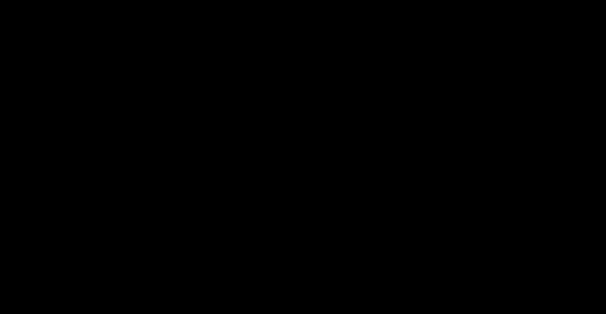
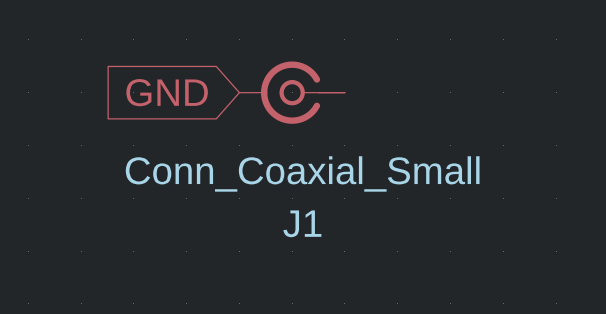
global label: none -> GND (167, 92)
J1: none -> Conn_Coaxial_Small (292, 92)

